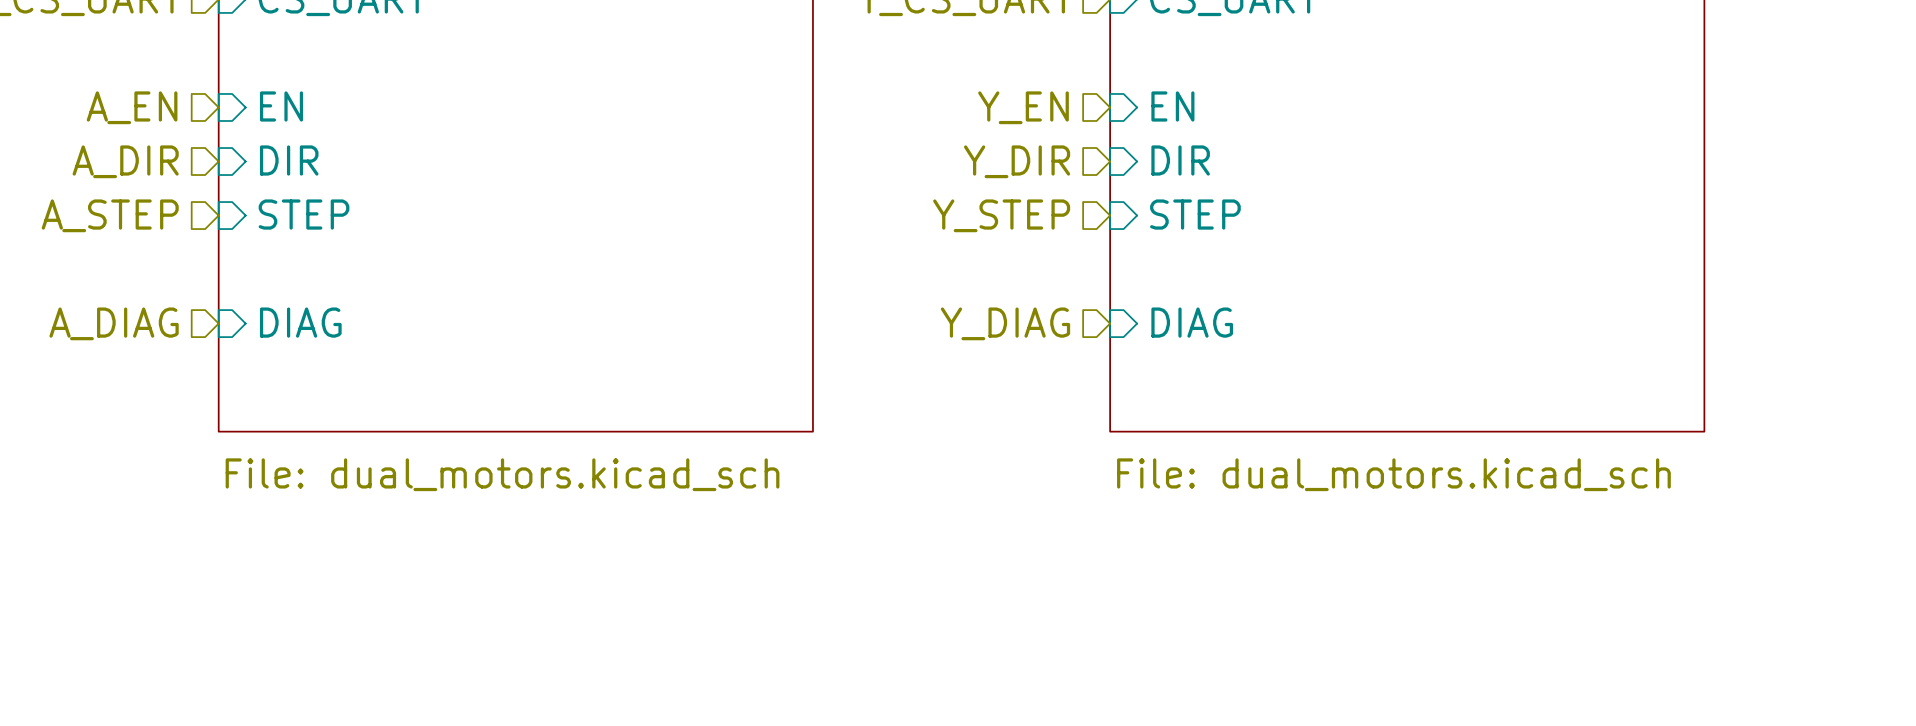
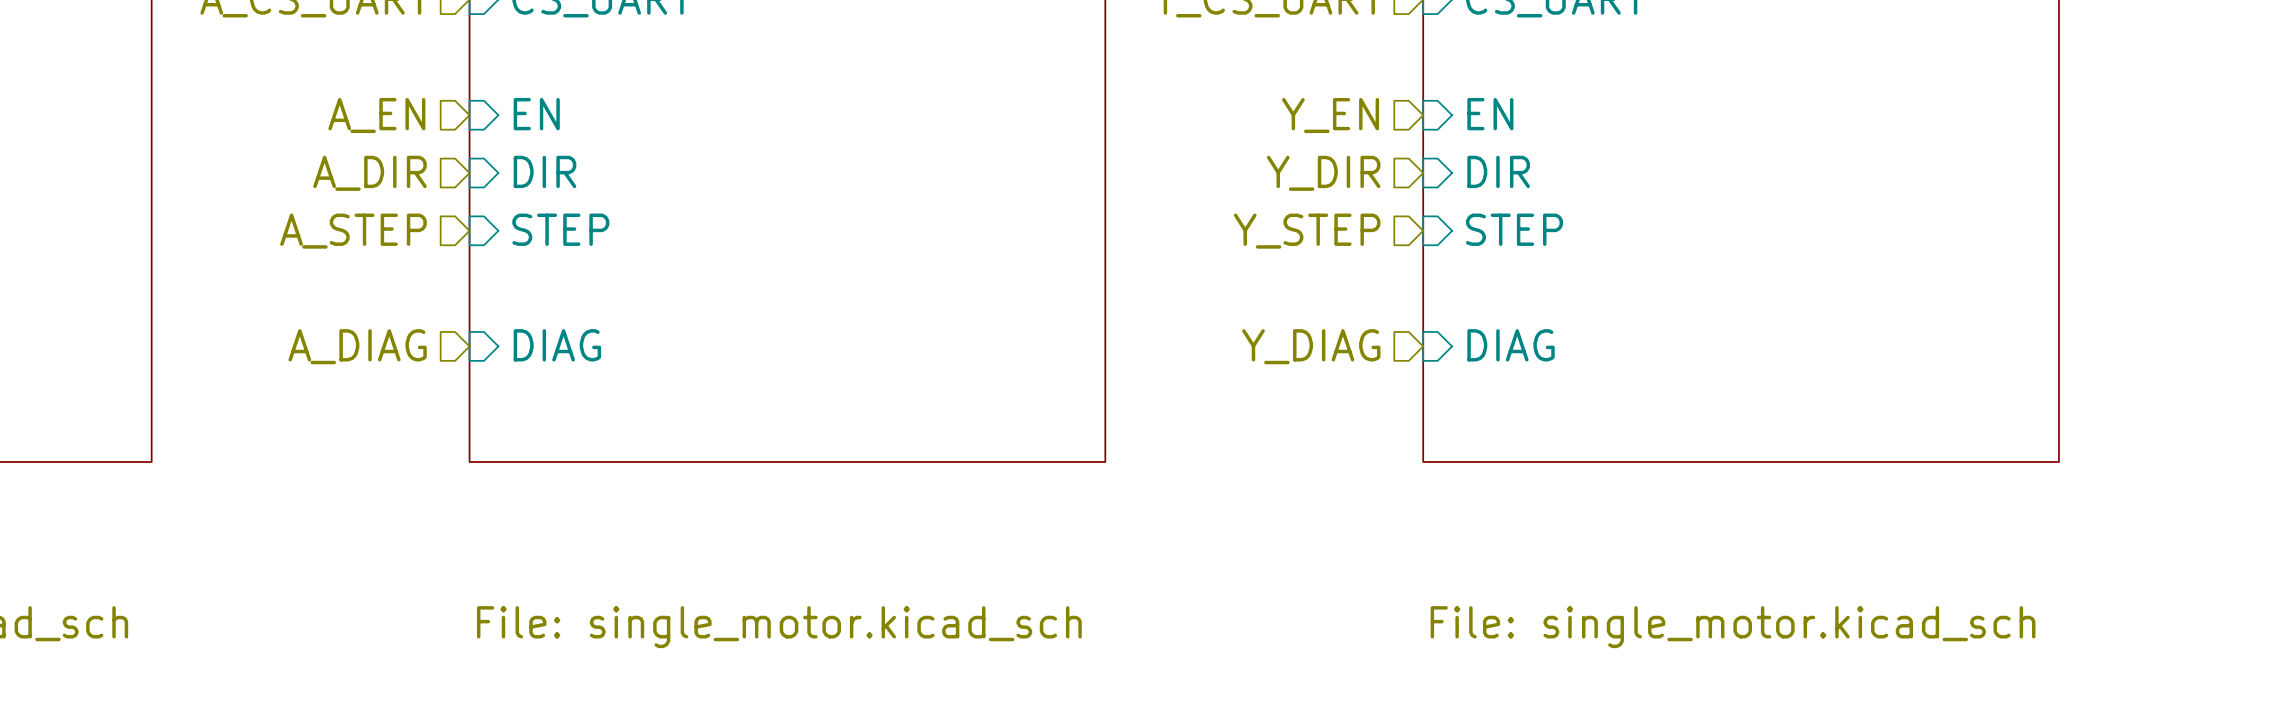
sheet value: File: dual_motors.kicad_sch (502, 474) -> File: single_motor.kicad_sch (779, 627)
sheet value: File: dual_motors.kicad_sch (1393, 474) -> File: single_motor.kicad_sch (1733, 627)

